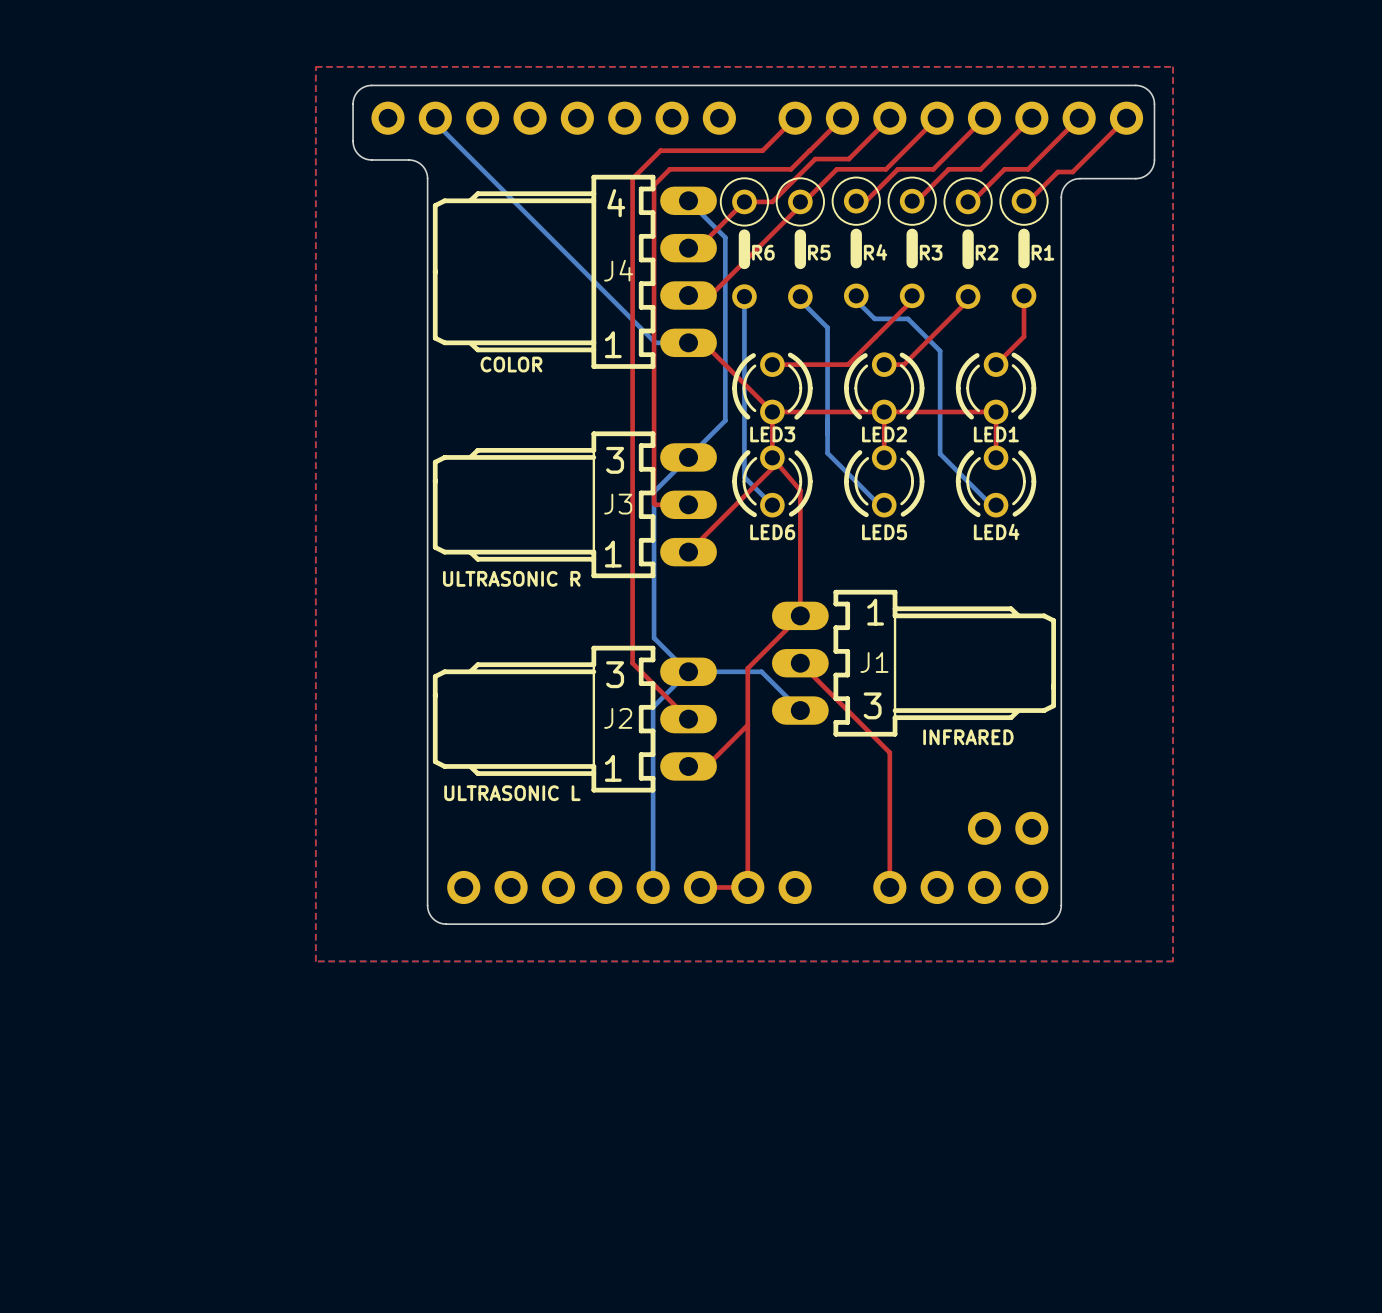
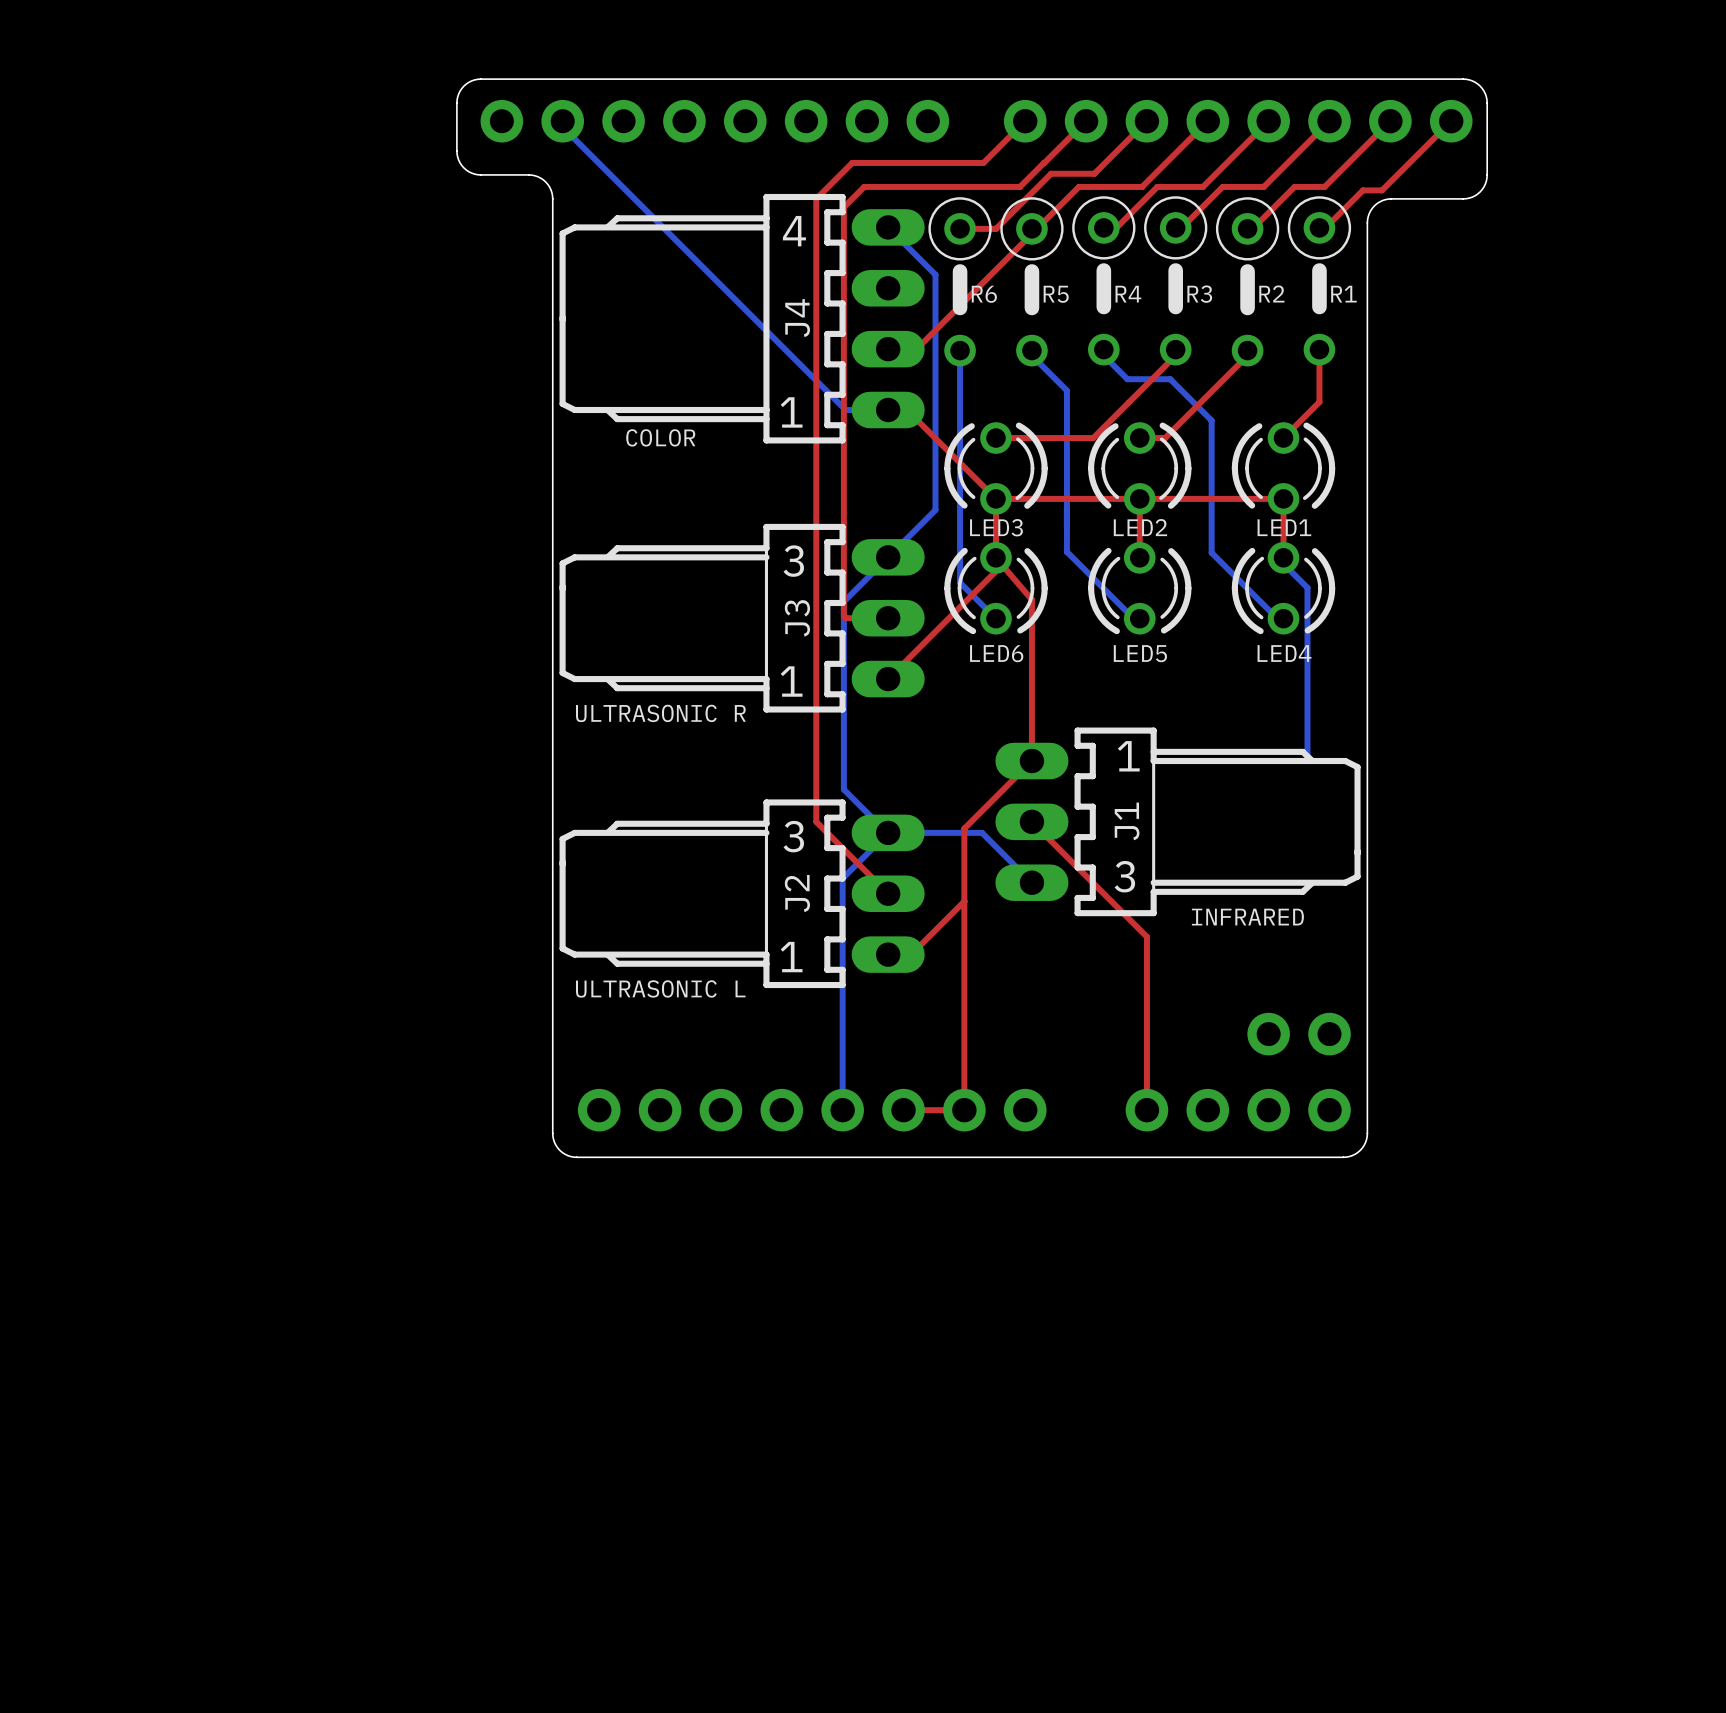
top zone outline: (315, 66) (315, 961) (1173, 961) (1173, 66) (315, 66) -> none
top track: (744, 201) (698, 248) (688, 248) -> none
J4 name rotation: 0° (618, 270) -> 90° counterclockwise (797, 318)
bottom track: none -> (1283, 563) (1307, 587) (1307, 761)
J3 name rotation: 0° (618, 504) -> 90° counterclockwise (797, 618)
J1 name rotation: 0° (874, 662) -> 90° counterclockwise (1127, 821)
J2 name rotation: 0° (618, 718) -> 90° counterclockwise (797, 893)

